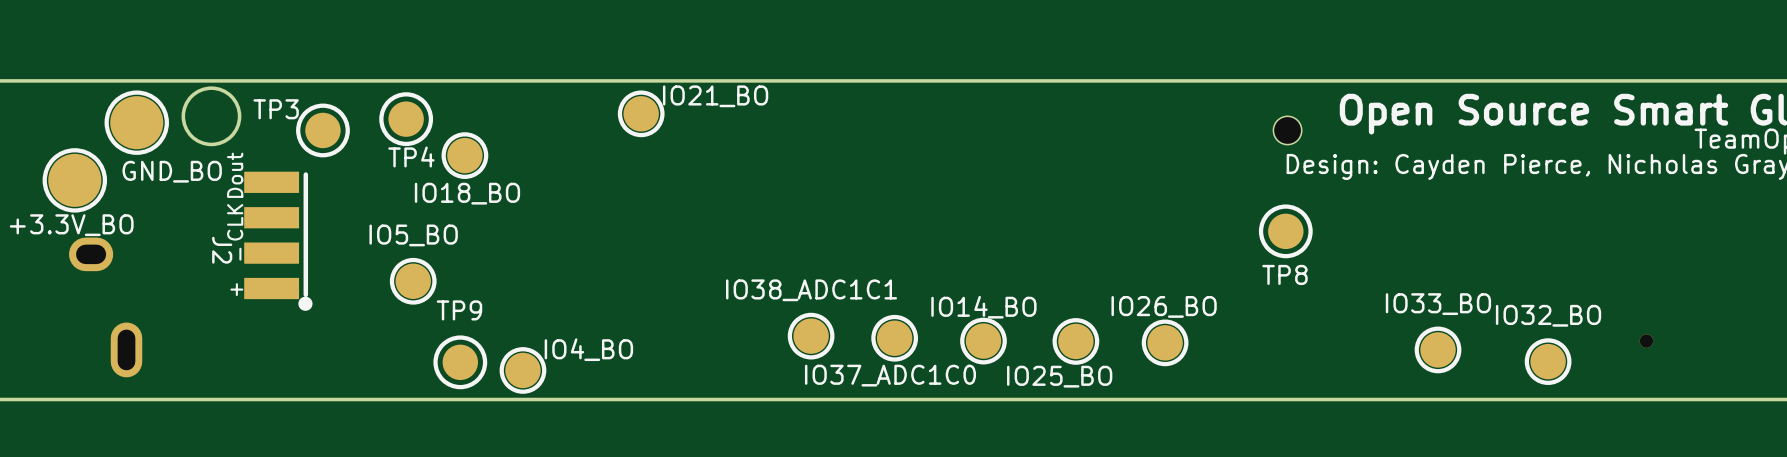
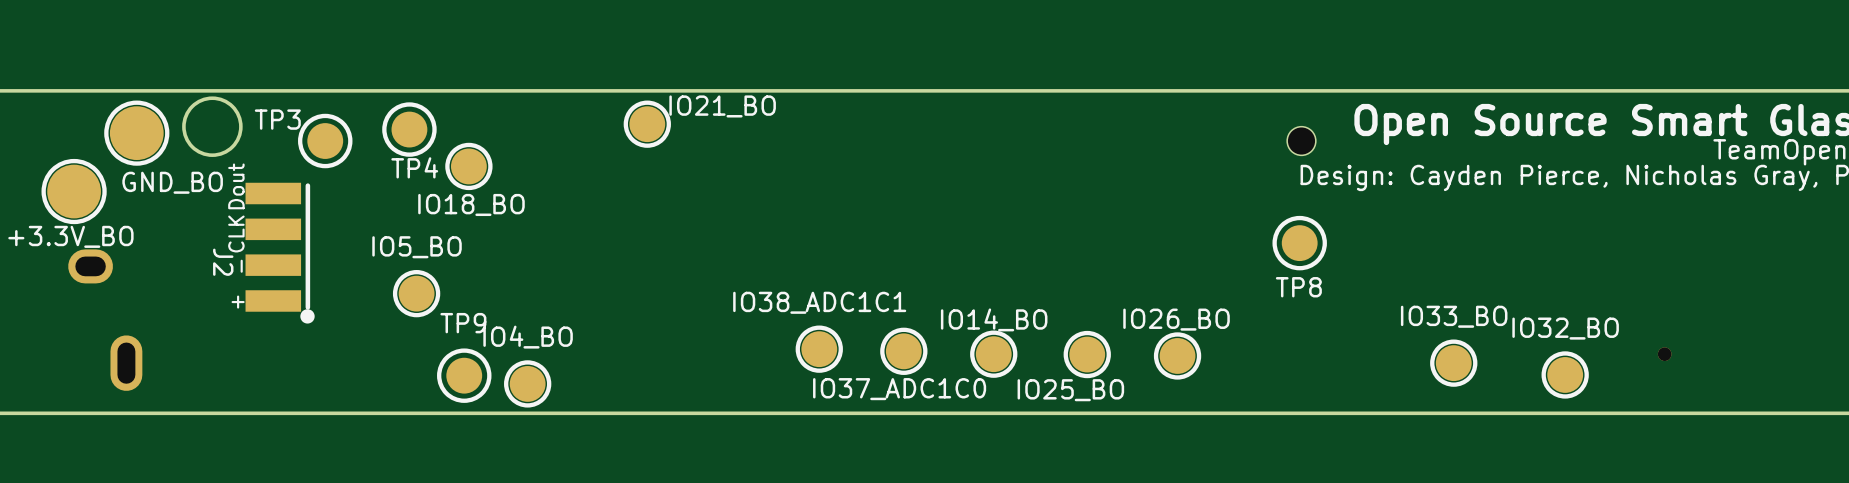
part value position: IO4_BO (588, 349) -> IO4_BO (528, 337)

